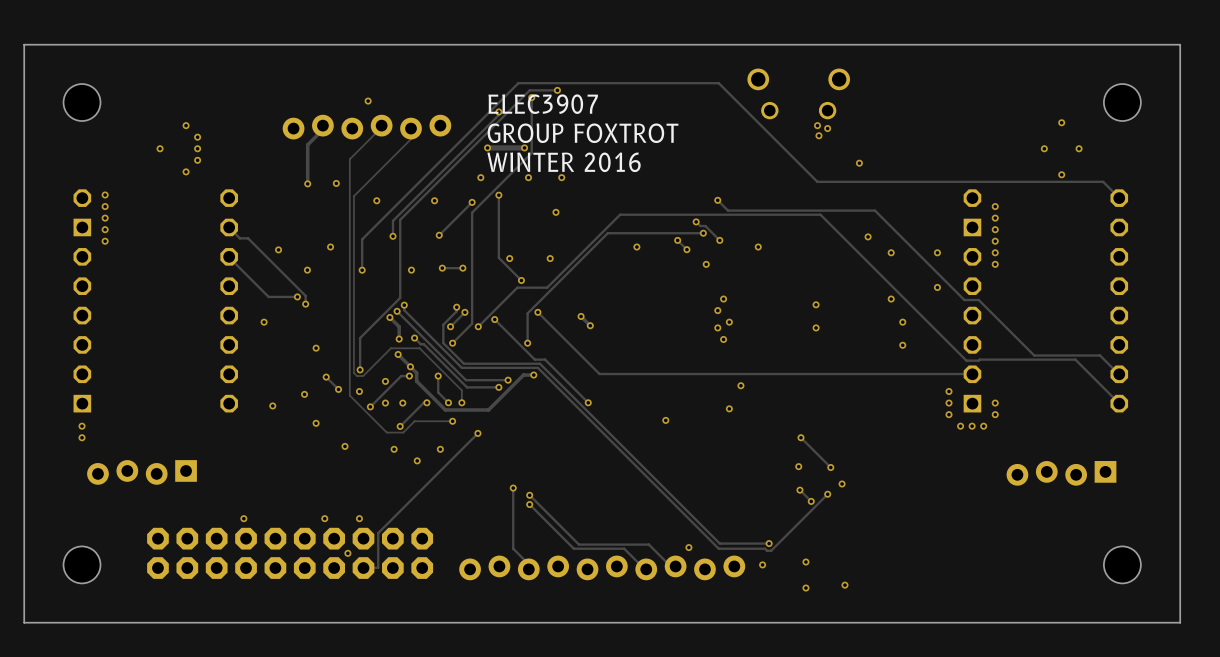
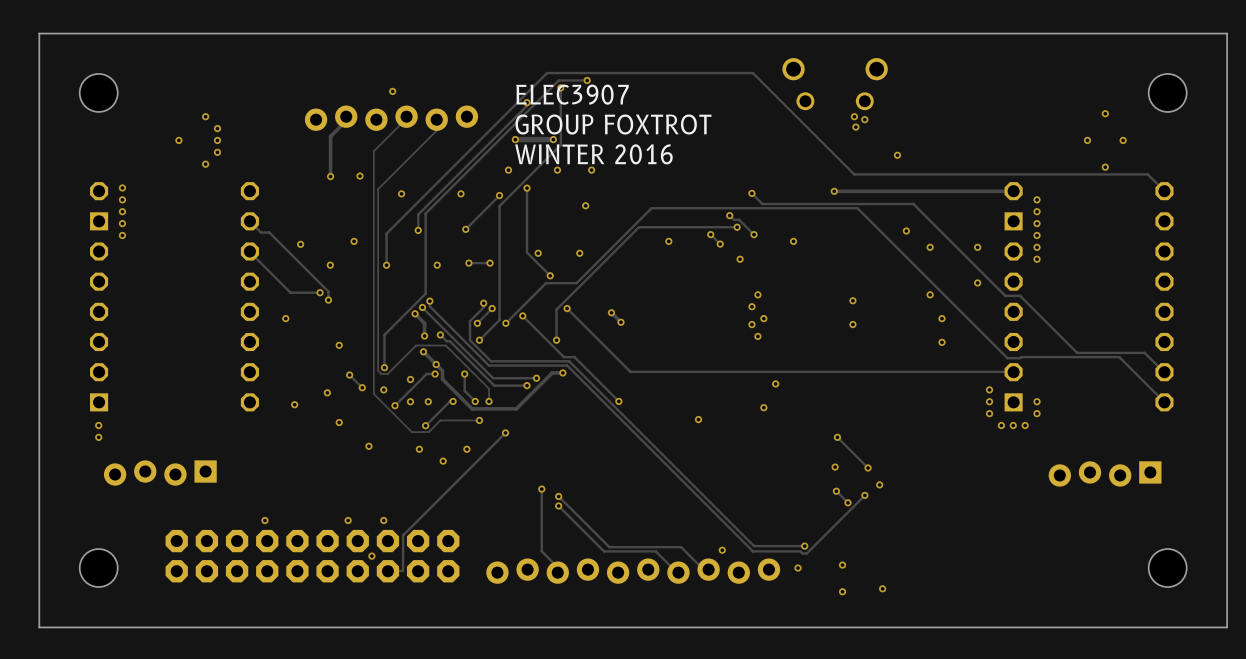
via: none -> (834, 191)
track: none -> (1013, 191) (834, 191)

